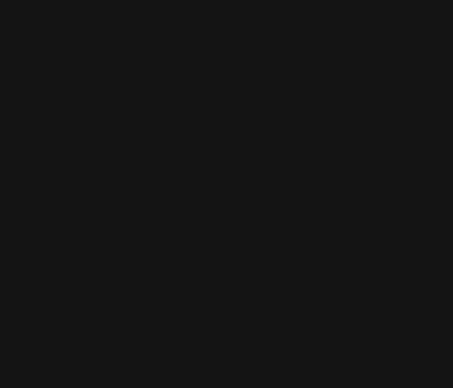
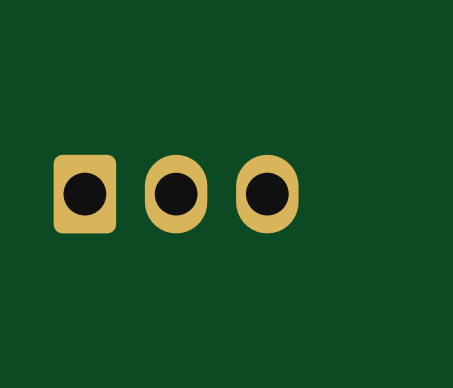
part: none -> (176, 194)

